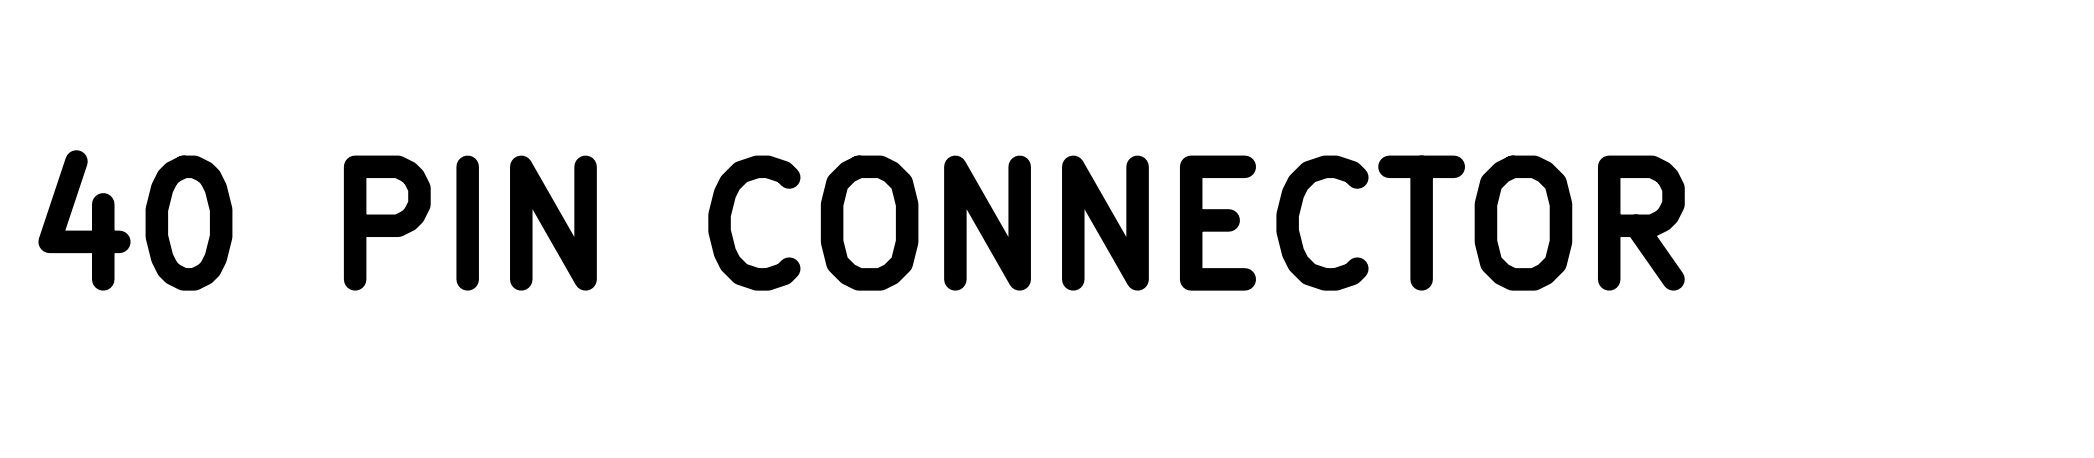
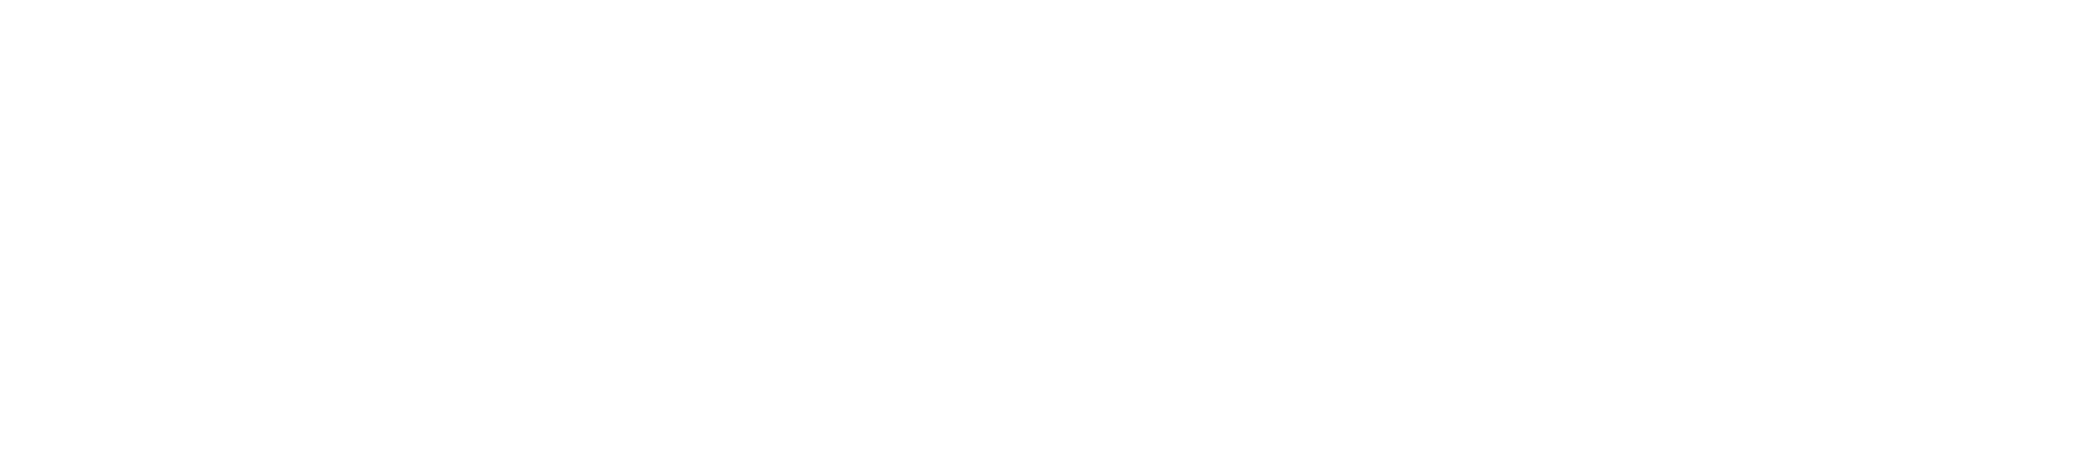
text: 40 PIN CONNECTOR (861, 220) -> none

